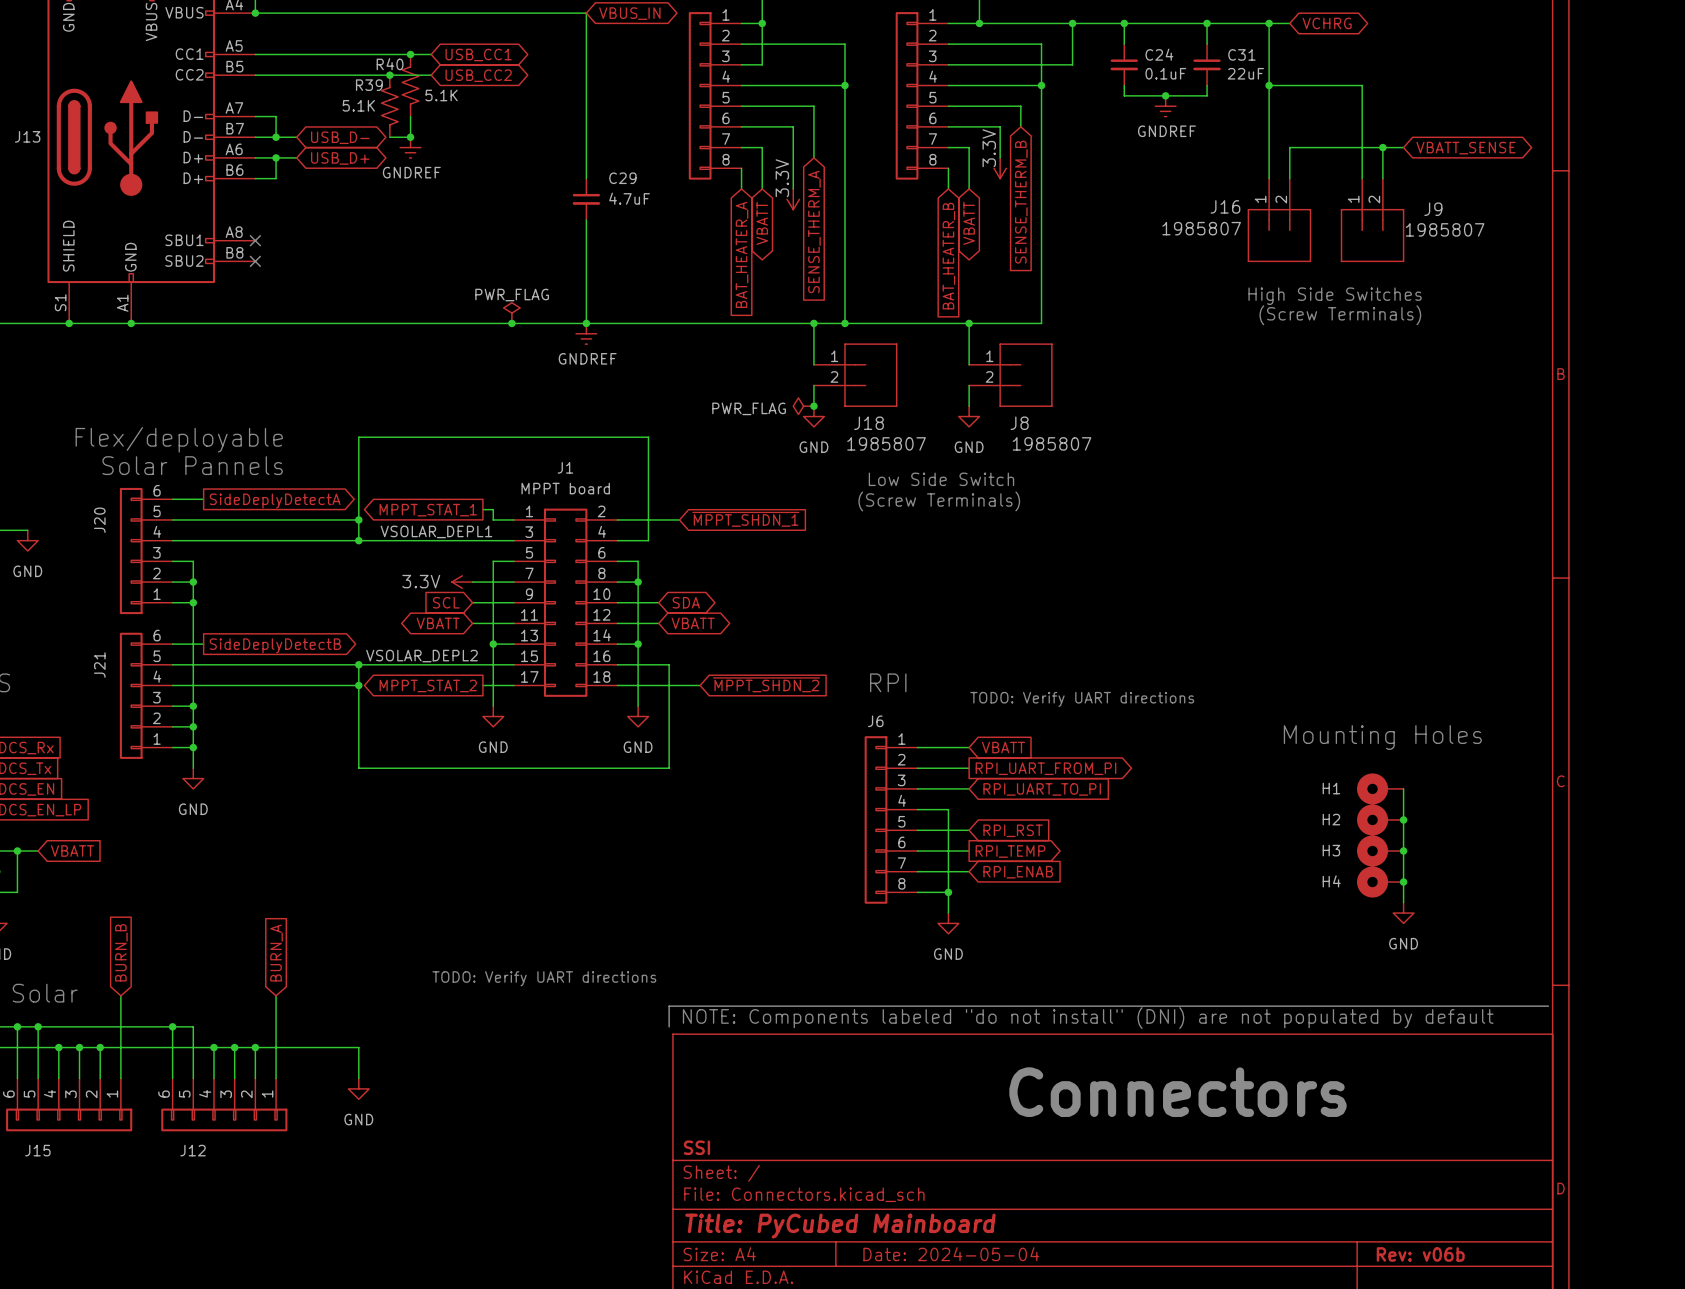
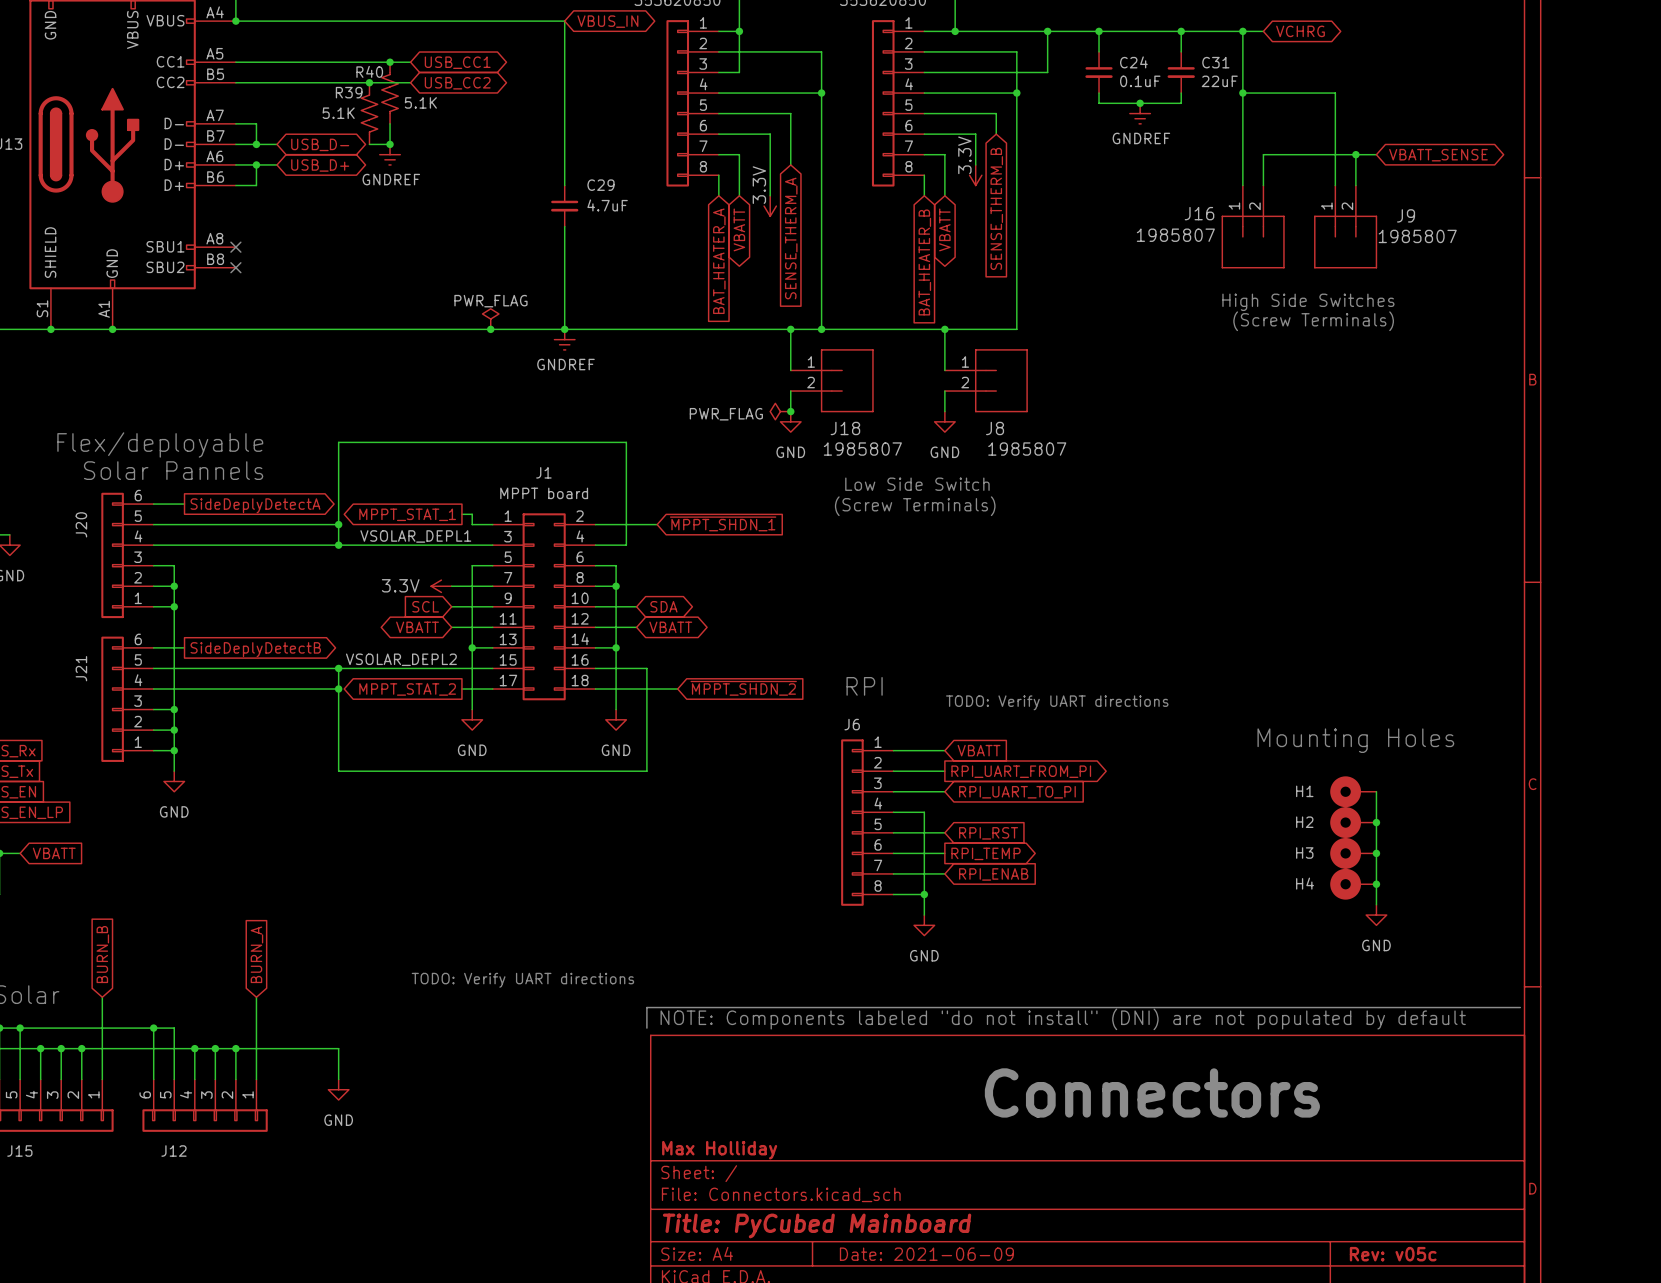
title block: SSI (696, 1147) -> Max Holliday (719, 1150)
title block: Date: 2024-05-04 (951, 1254) -> Date: 2021-06-09 (926, 1254)
title block: Rev: v06b (1420, 1254) -> Rev: v05c (1393, 1254)

